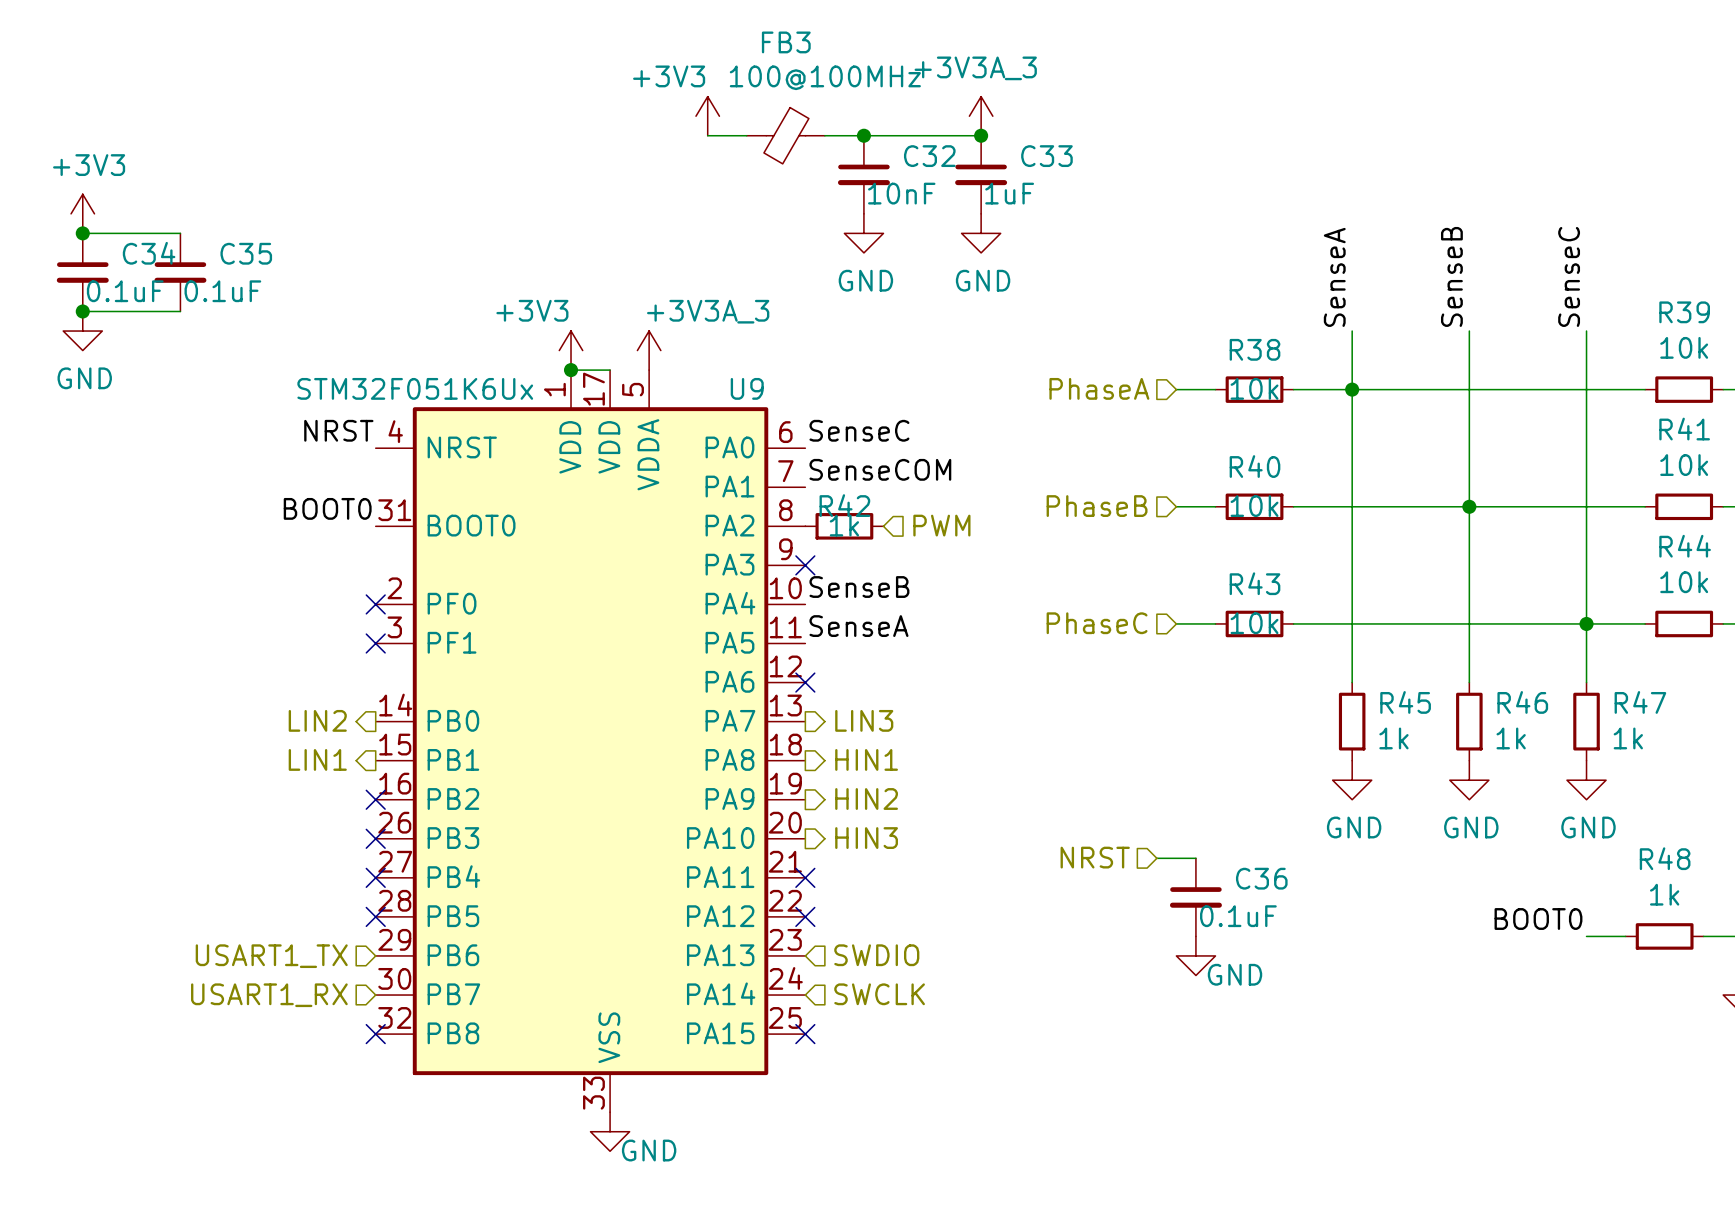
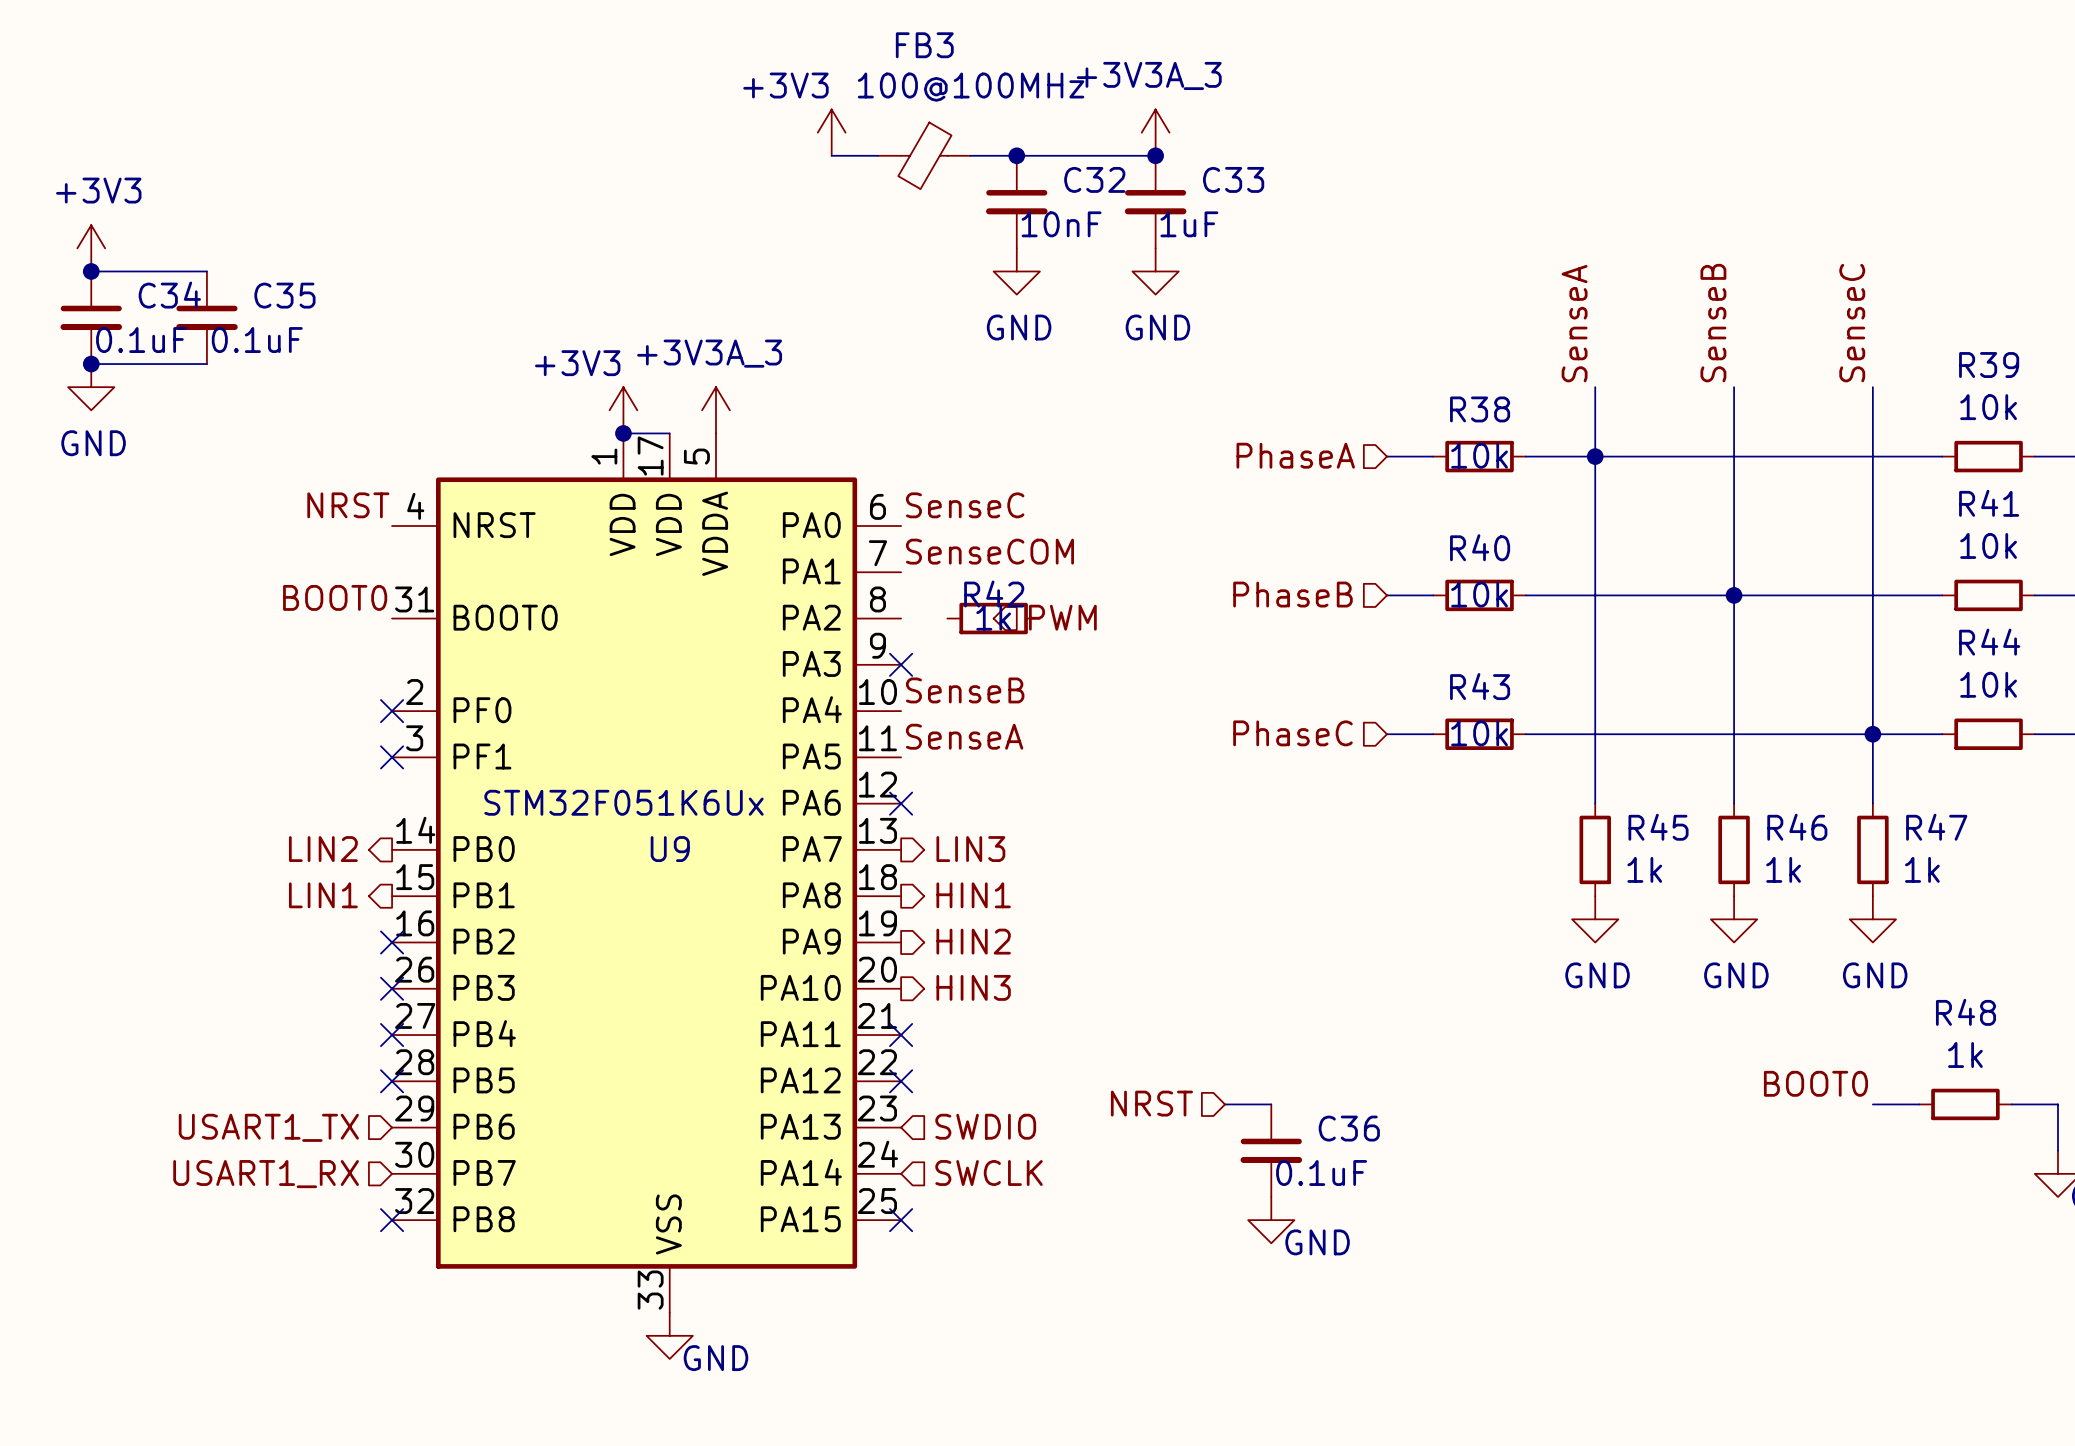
power symbol text position: +3V3A_3 (708, 311) -> +3V3A_3 (709, 353)
power symbol position: +3V3 (571, 350) -> +3V3 (623, 410)
power symbol position: +3V3A_3 (649, 350) -> +3V3A_3 (715, 410)
wire: (571, 370) (610, 370) -> (669, 433) (623, 433)
junction position: (571, 370) -> (623, 433)
U9 value position: STM32F051K6Ux (415, 388) -> STM32F051K6Ux (623, 802)
U9 name position: U9 (747, 388) -> U9 (670, 849)
label position: NRST (338, 430) -> NRST (348, 505)
label position: SenseC (859, 430) -> SenseC (965, 505)
label position: SenseCOM (880, 469) -> SenseCOM (989, 551)
label position: BOOT0 (327, 508) -> BOOT0 (335, 597)
hierarchical label position: PWM (941, 525) -> PWM (1062, 617)
no-connect mark position: (805, 565) -> (901, 664)
label position: SenseB (859, 587) -> SenseB (965, 690)
no-connect mark: none -> (392, 711)
no-connect mark: (375, 604) -> none
label position: SenseA (858, 626) -> SenseA (964, 736)
no-connect mark: none -> (392, 757)
no-connect mark: (375, 643) -> none
no-connect mark position: (805, 682) -> (901, 803)
hierarchical label position: LIN2 (317, 720) -> LIN2 (323, 849)
hierarchical label position: LIN3 (864, 720) -> LIN3 (970, 849)
U9 position: (590, 741) -> (646, 873)
hierarchical label position: LIN1 (317, 759) -> LIN1 (323, 895)
hierarchical label position: HIN1 (866, 759) -> HIN1 (973, 895)
no-connect mark: none -> (392, 942)
no-connect mark: (375, 799) -> none
hierarchical label position: HIN2 (866, 799) -> HIN2 (973, 941)
no-connect mark: none -> (392, 988)
no-connect mark: (375, 838) -> none
hierarchical label position: HIN3 (866, 838) -> HIN3 (973, 987)
hierarchical label position: NRST (1095, 857) -> NRST (1151, 1103)
wire: (1156, 858) (1195, 858) -> (1225, 1104) (1271, 1104)
no-connect mark: none -> (392, 1035)
no-connect mark: (375, 877) -> none
no-connect mark: none -> (901, 1035)
no-connect mark: (805, 877) -> none
C36 position: (1195, 897) -> (1271, 1150)
no-connect mark: none -> (392, 1081)
no-connect mark: (375, 916) -> none
no-connect mark: none -> (901, 1081)
no-connect mark: (805, 916) -> none
hierarchical label position: SWDIO (876, 955) -> SWDIO (985, 1126)
power symbol position: GND (1195, 955) -> GND (1271, 1220)
hierarchical label position: USART1_TX (271, 956) -> USART1_TX (268, 1127)
hierarchical label position: SWCLK (879, 994) -> SWCLK (989, 1172)
hierarchical label position: USART1_RX (269, 995) -> USART1_RX (266, 1174)
no-connect mark position: (375, 1034) -> (392, 1220)
no-connect mark position: (805, 1034) -> (901, 1220)
power symbol position: GND (610, 1131) -> GND (669, 1335)

